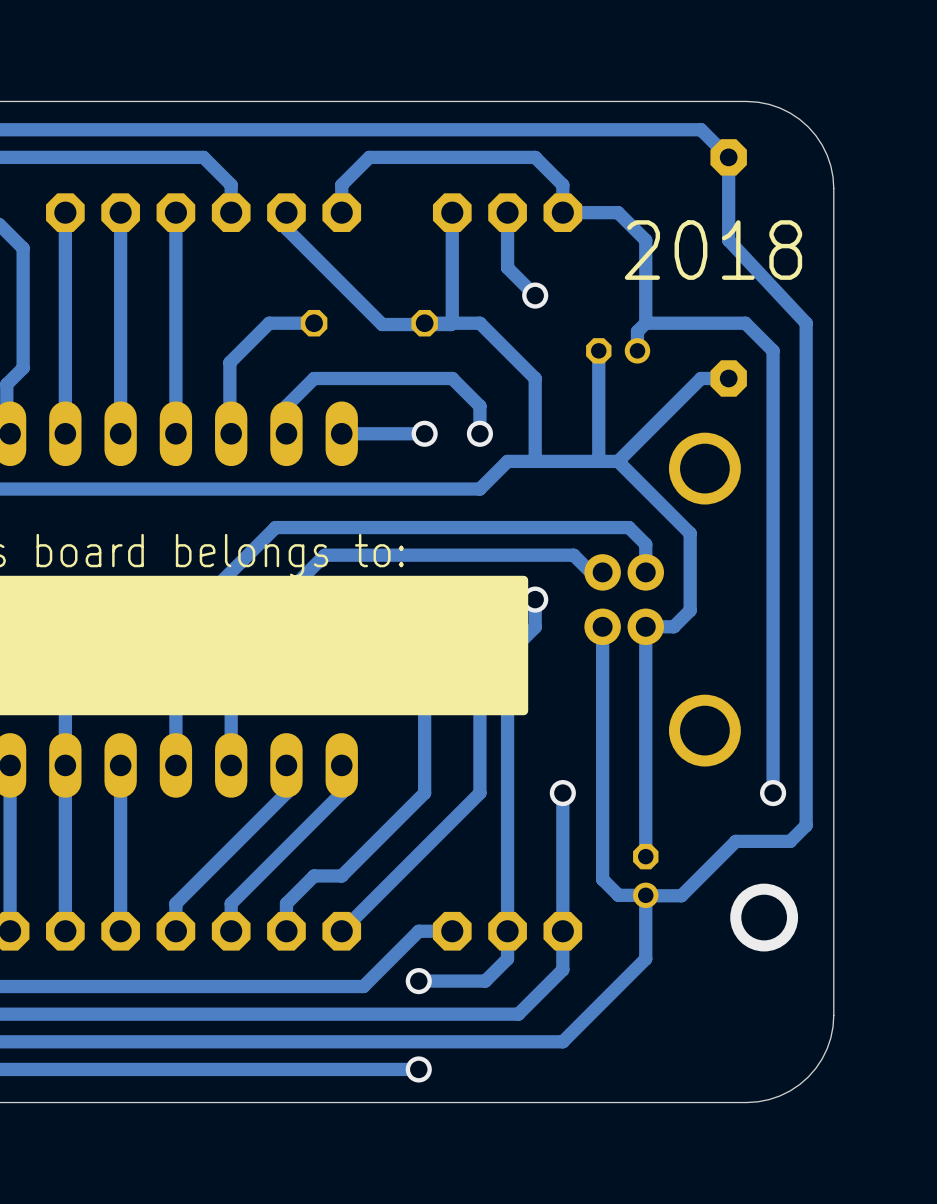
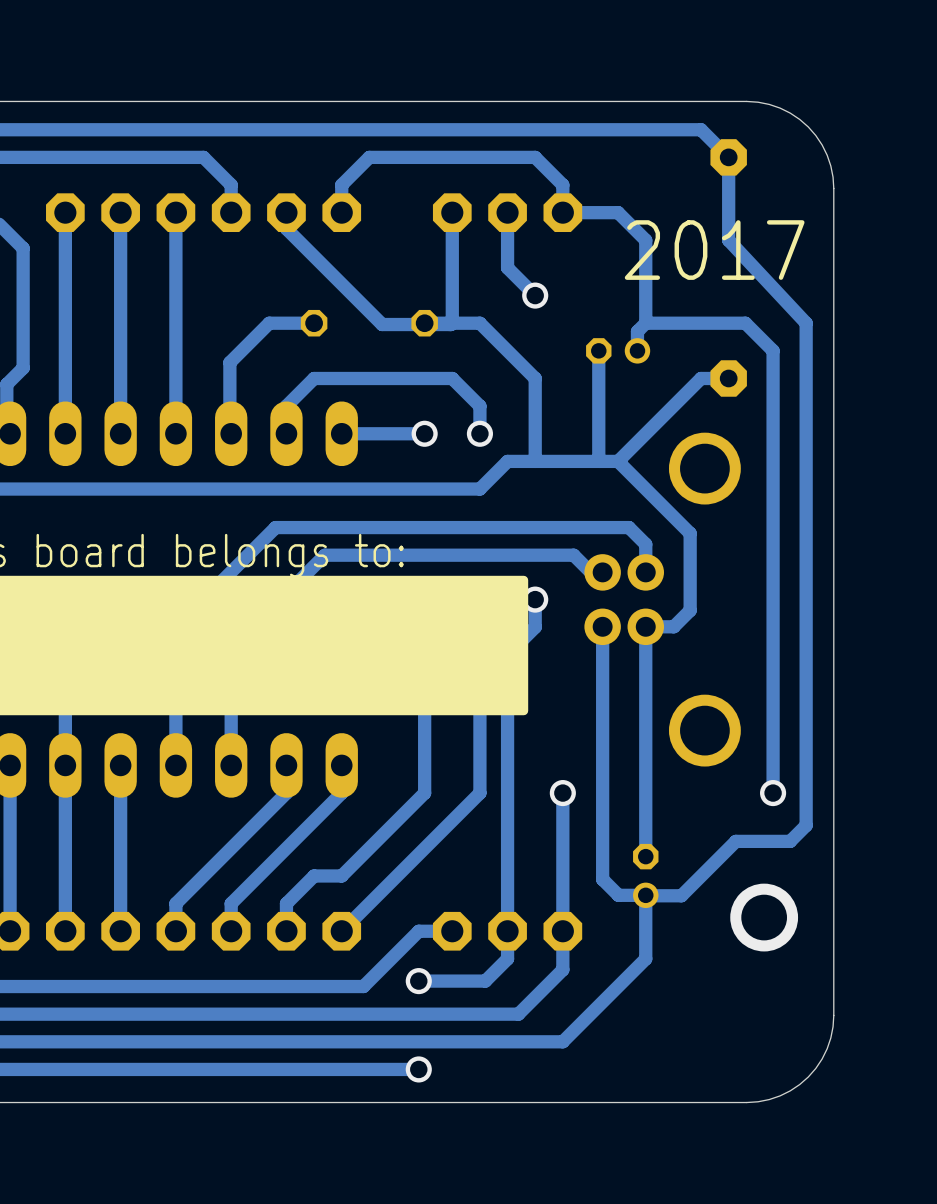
text: 2018 (713, 250) -> 2017 (714, 250)

